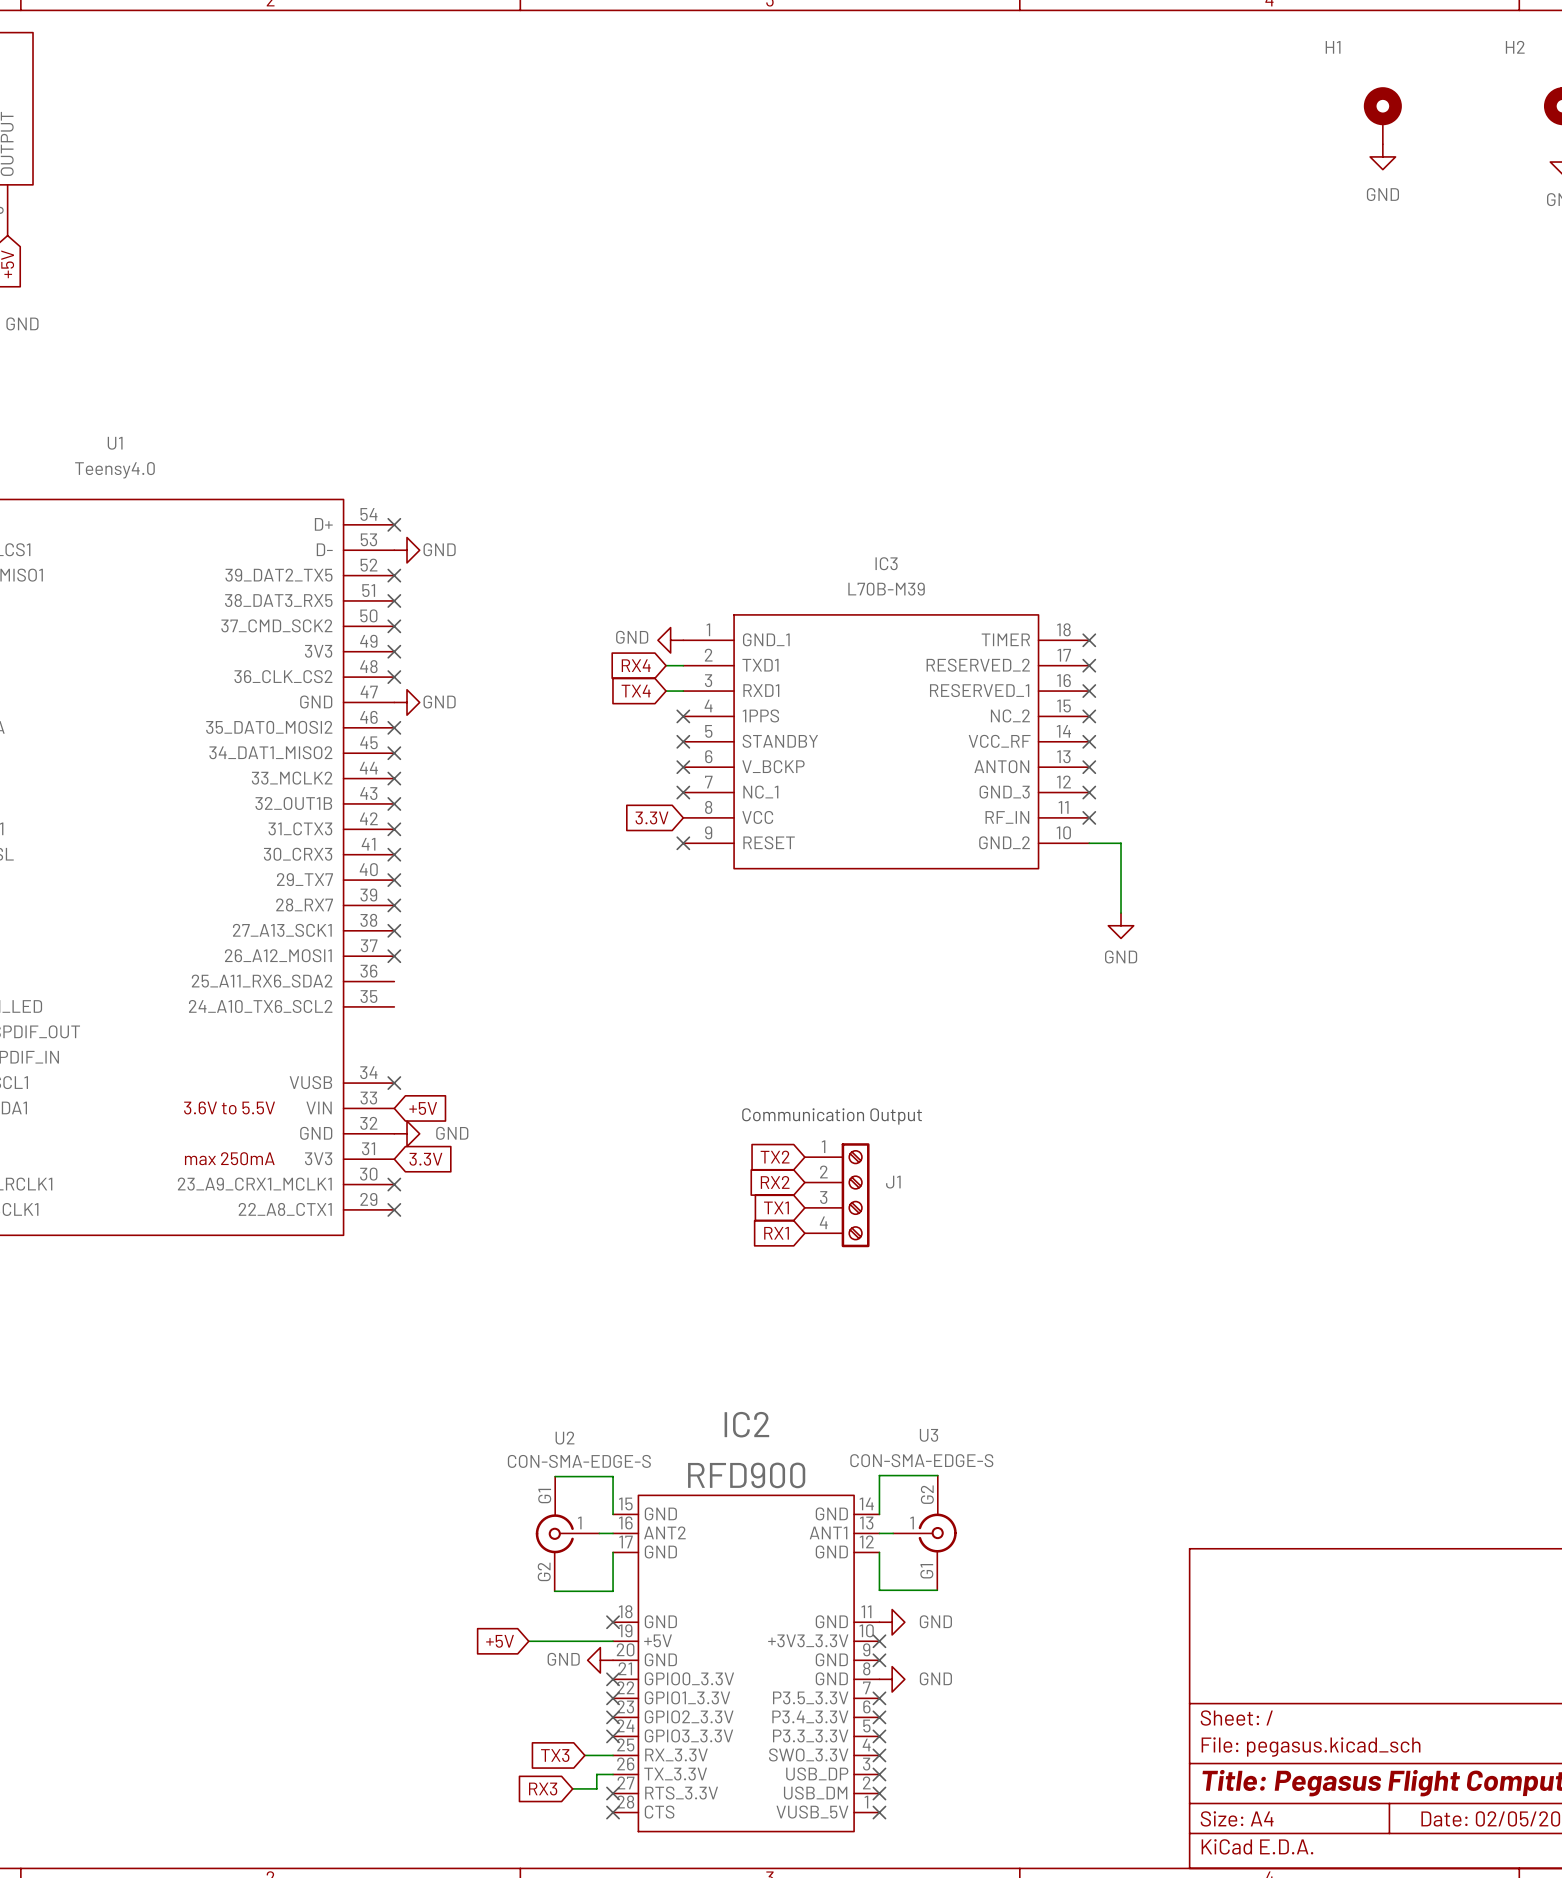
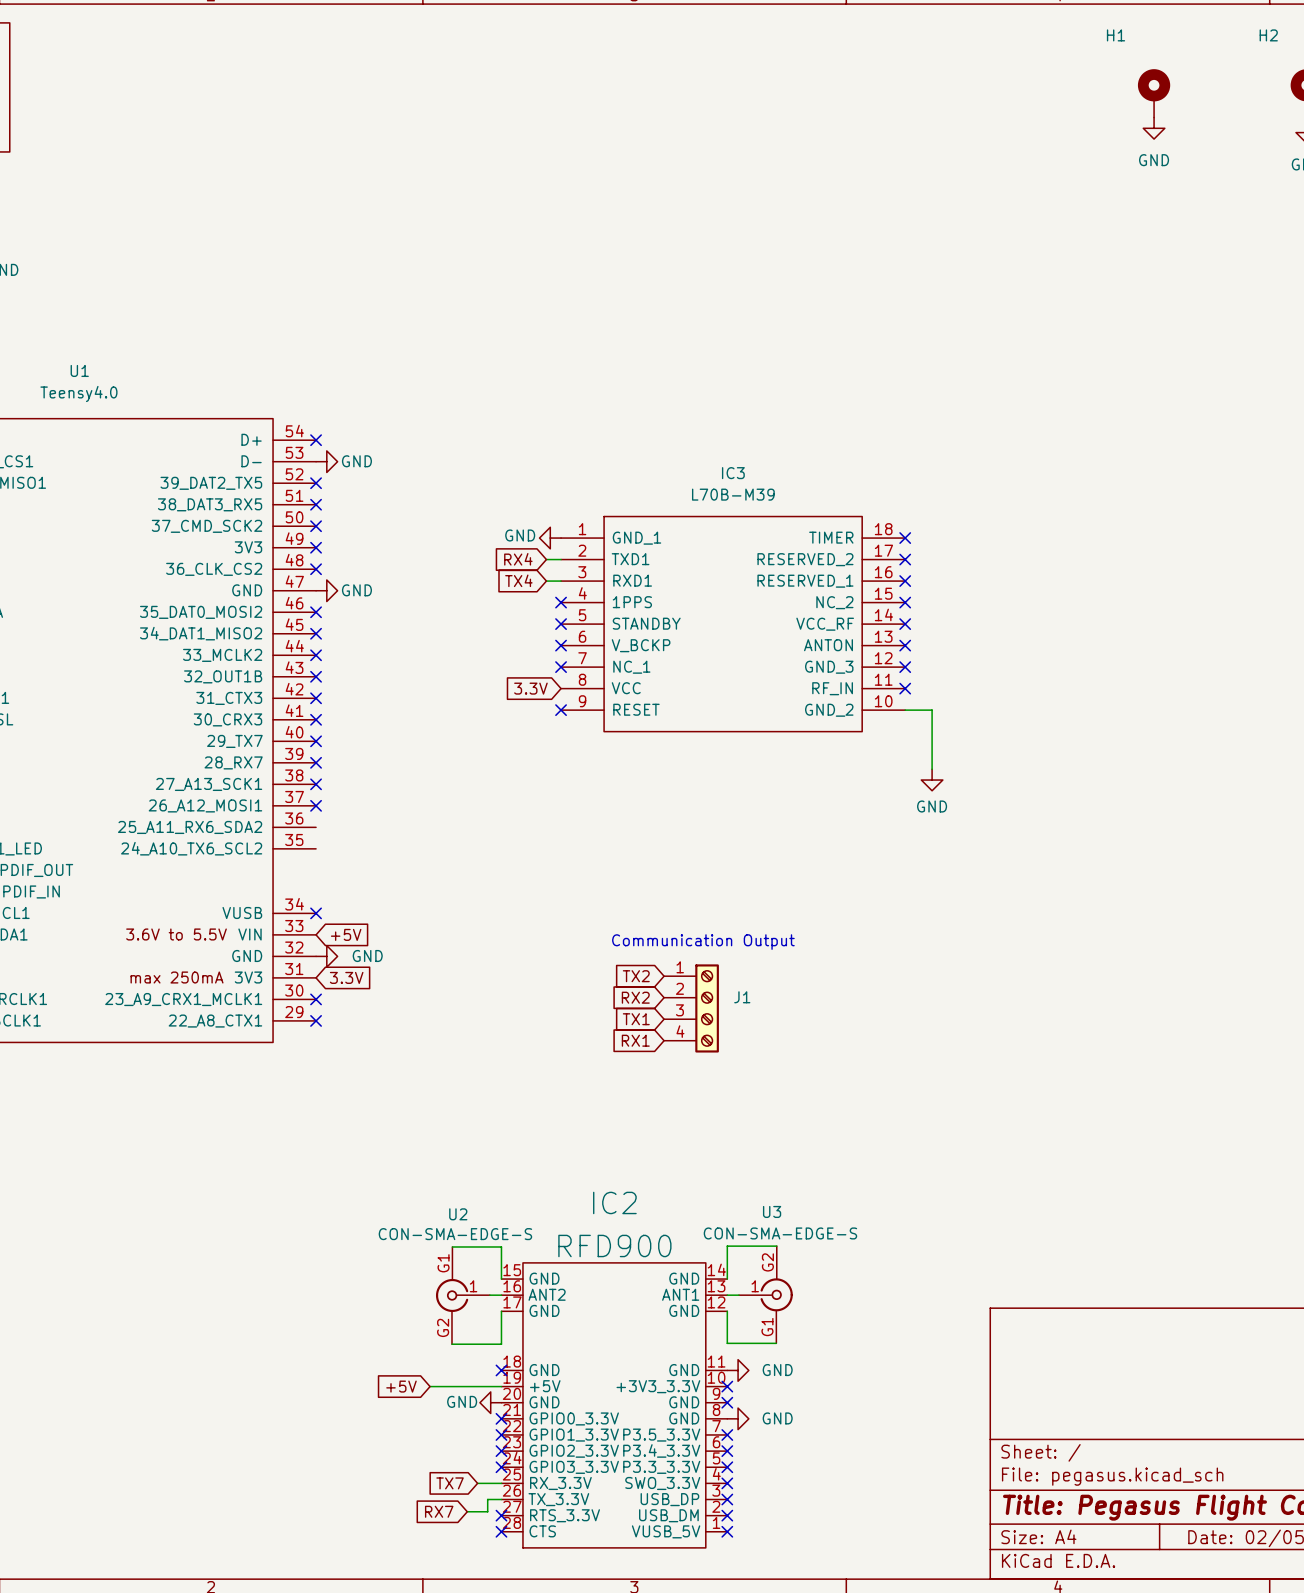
global label: TX3 (555, 1755) -> TX7 (450, 1483)
global label: RX3 (543, 1789) -> RX7 (439, 1511)

